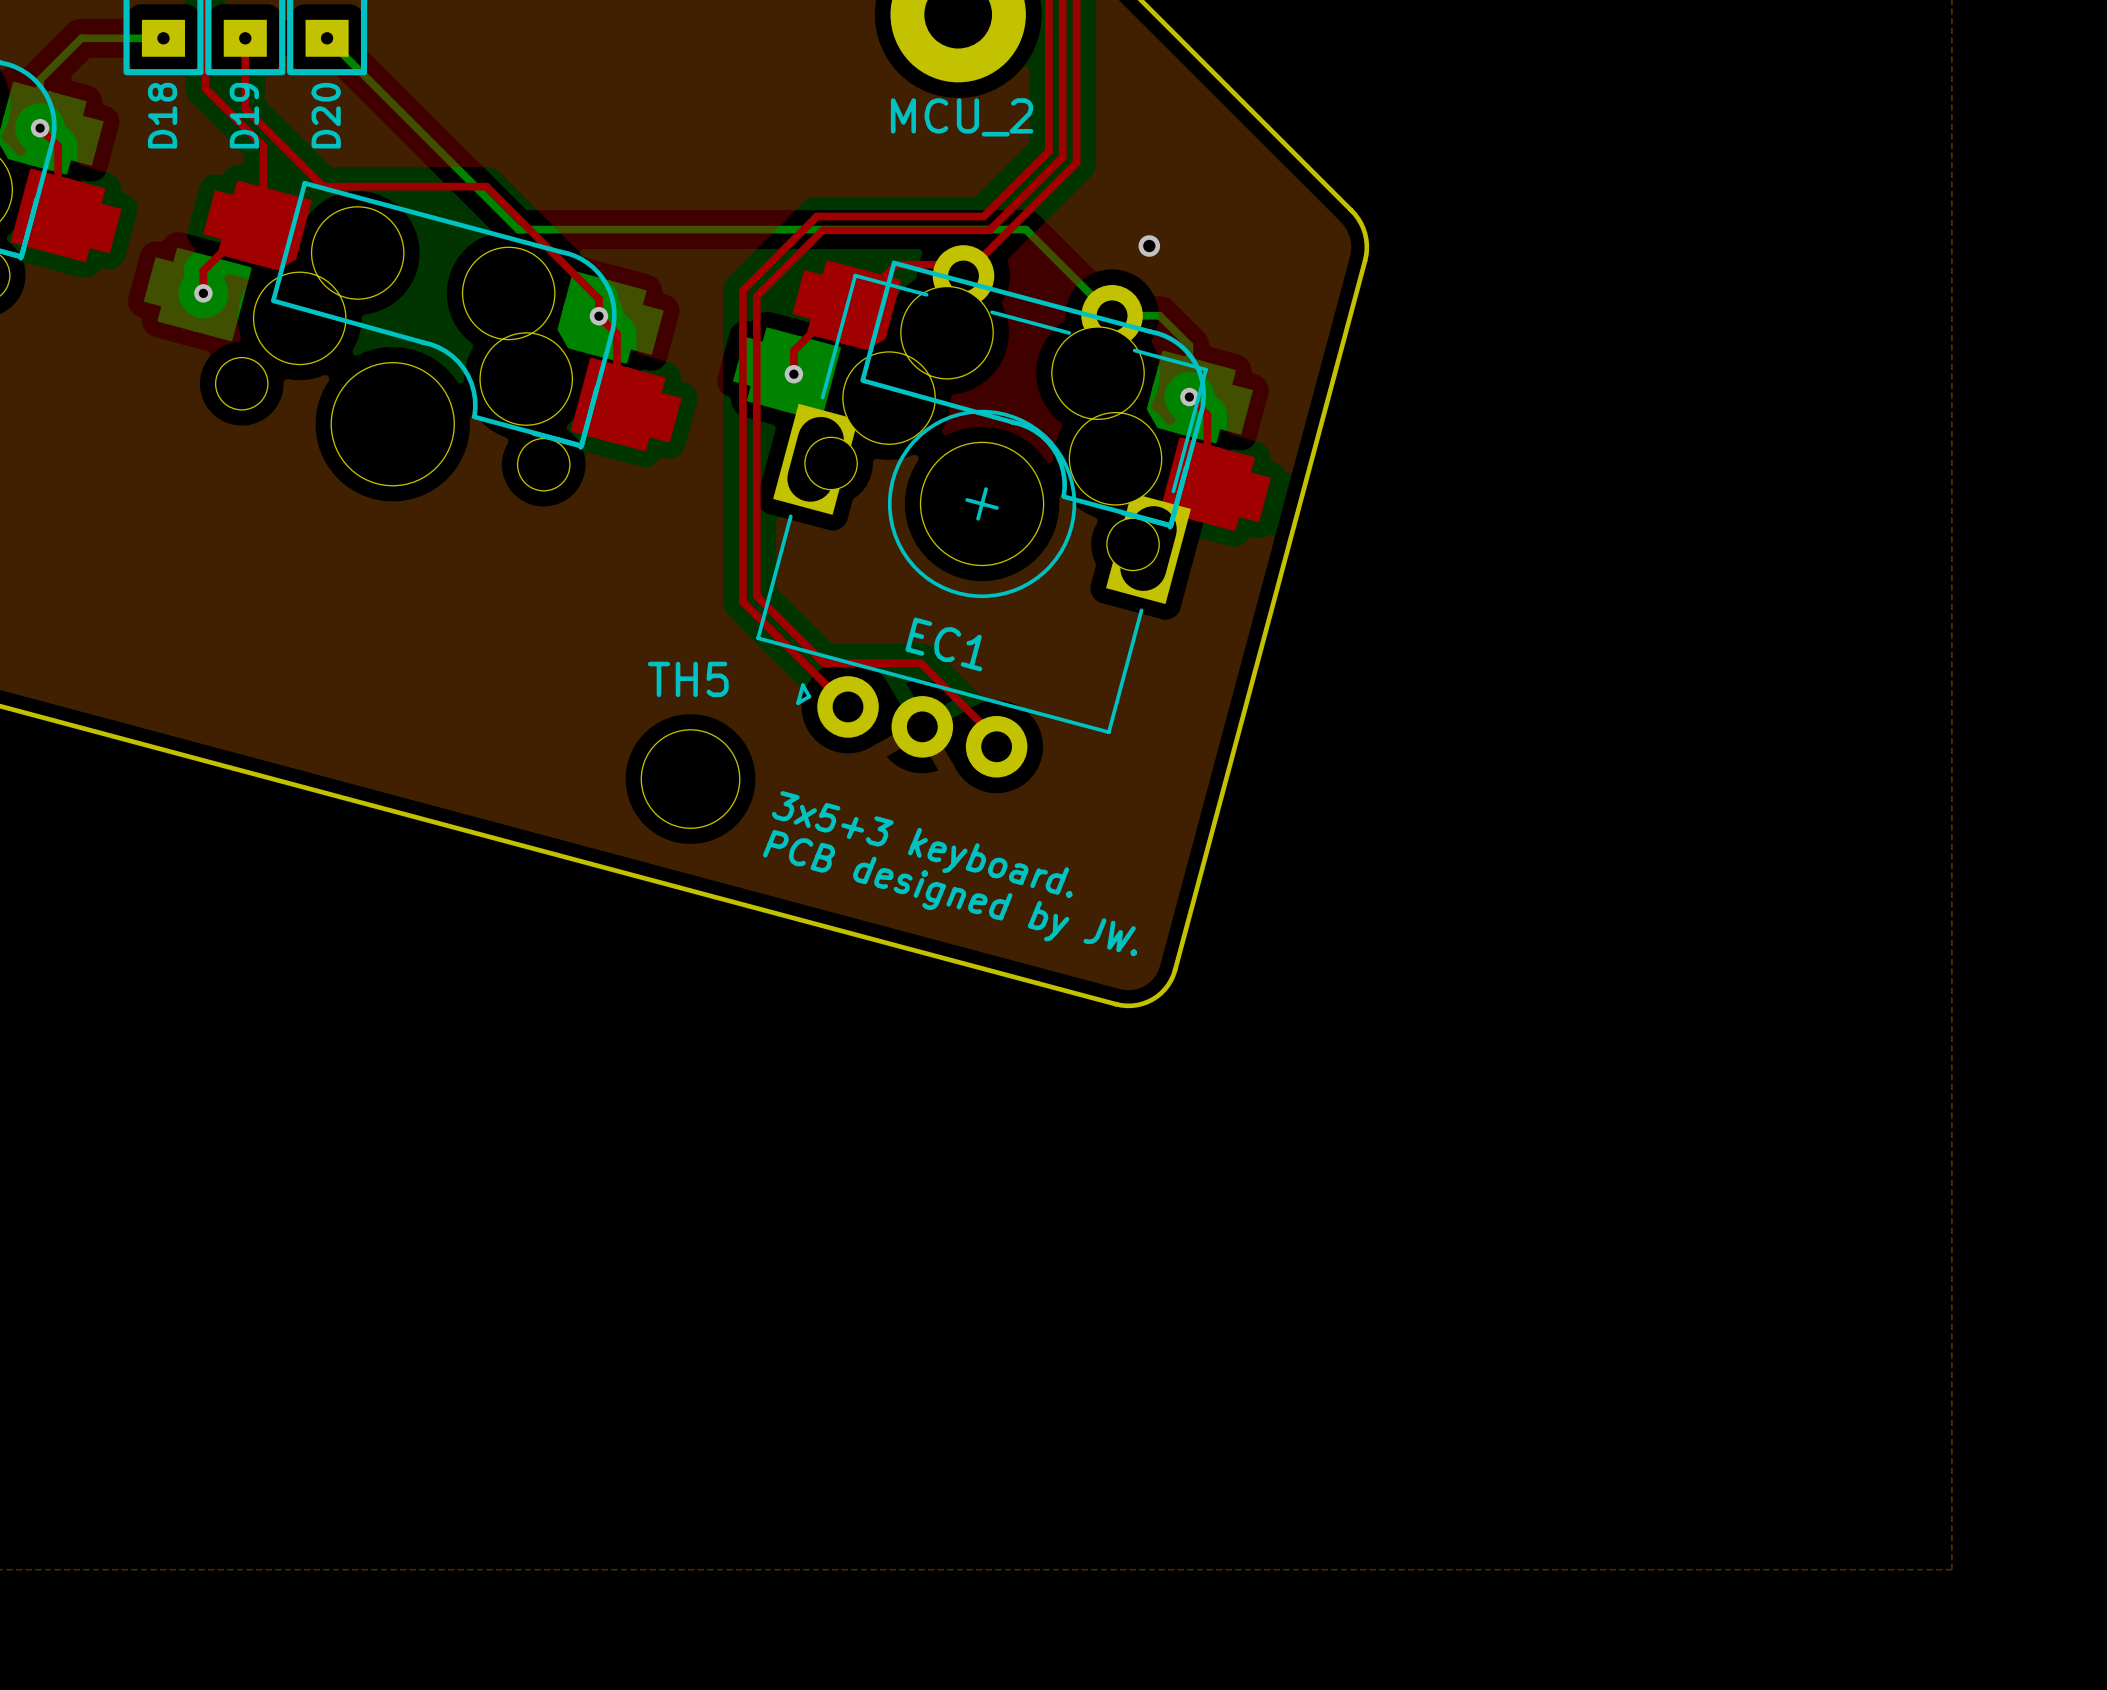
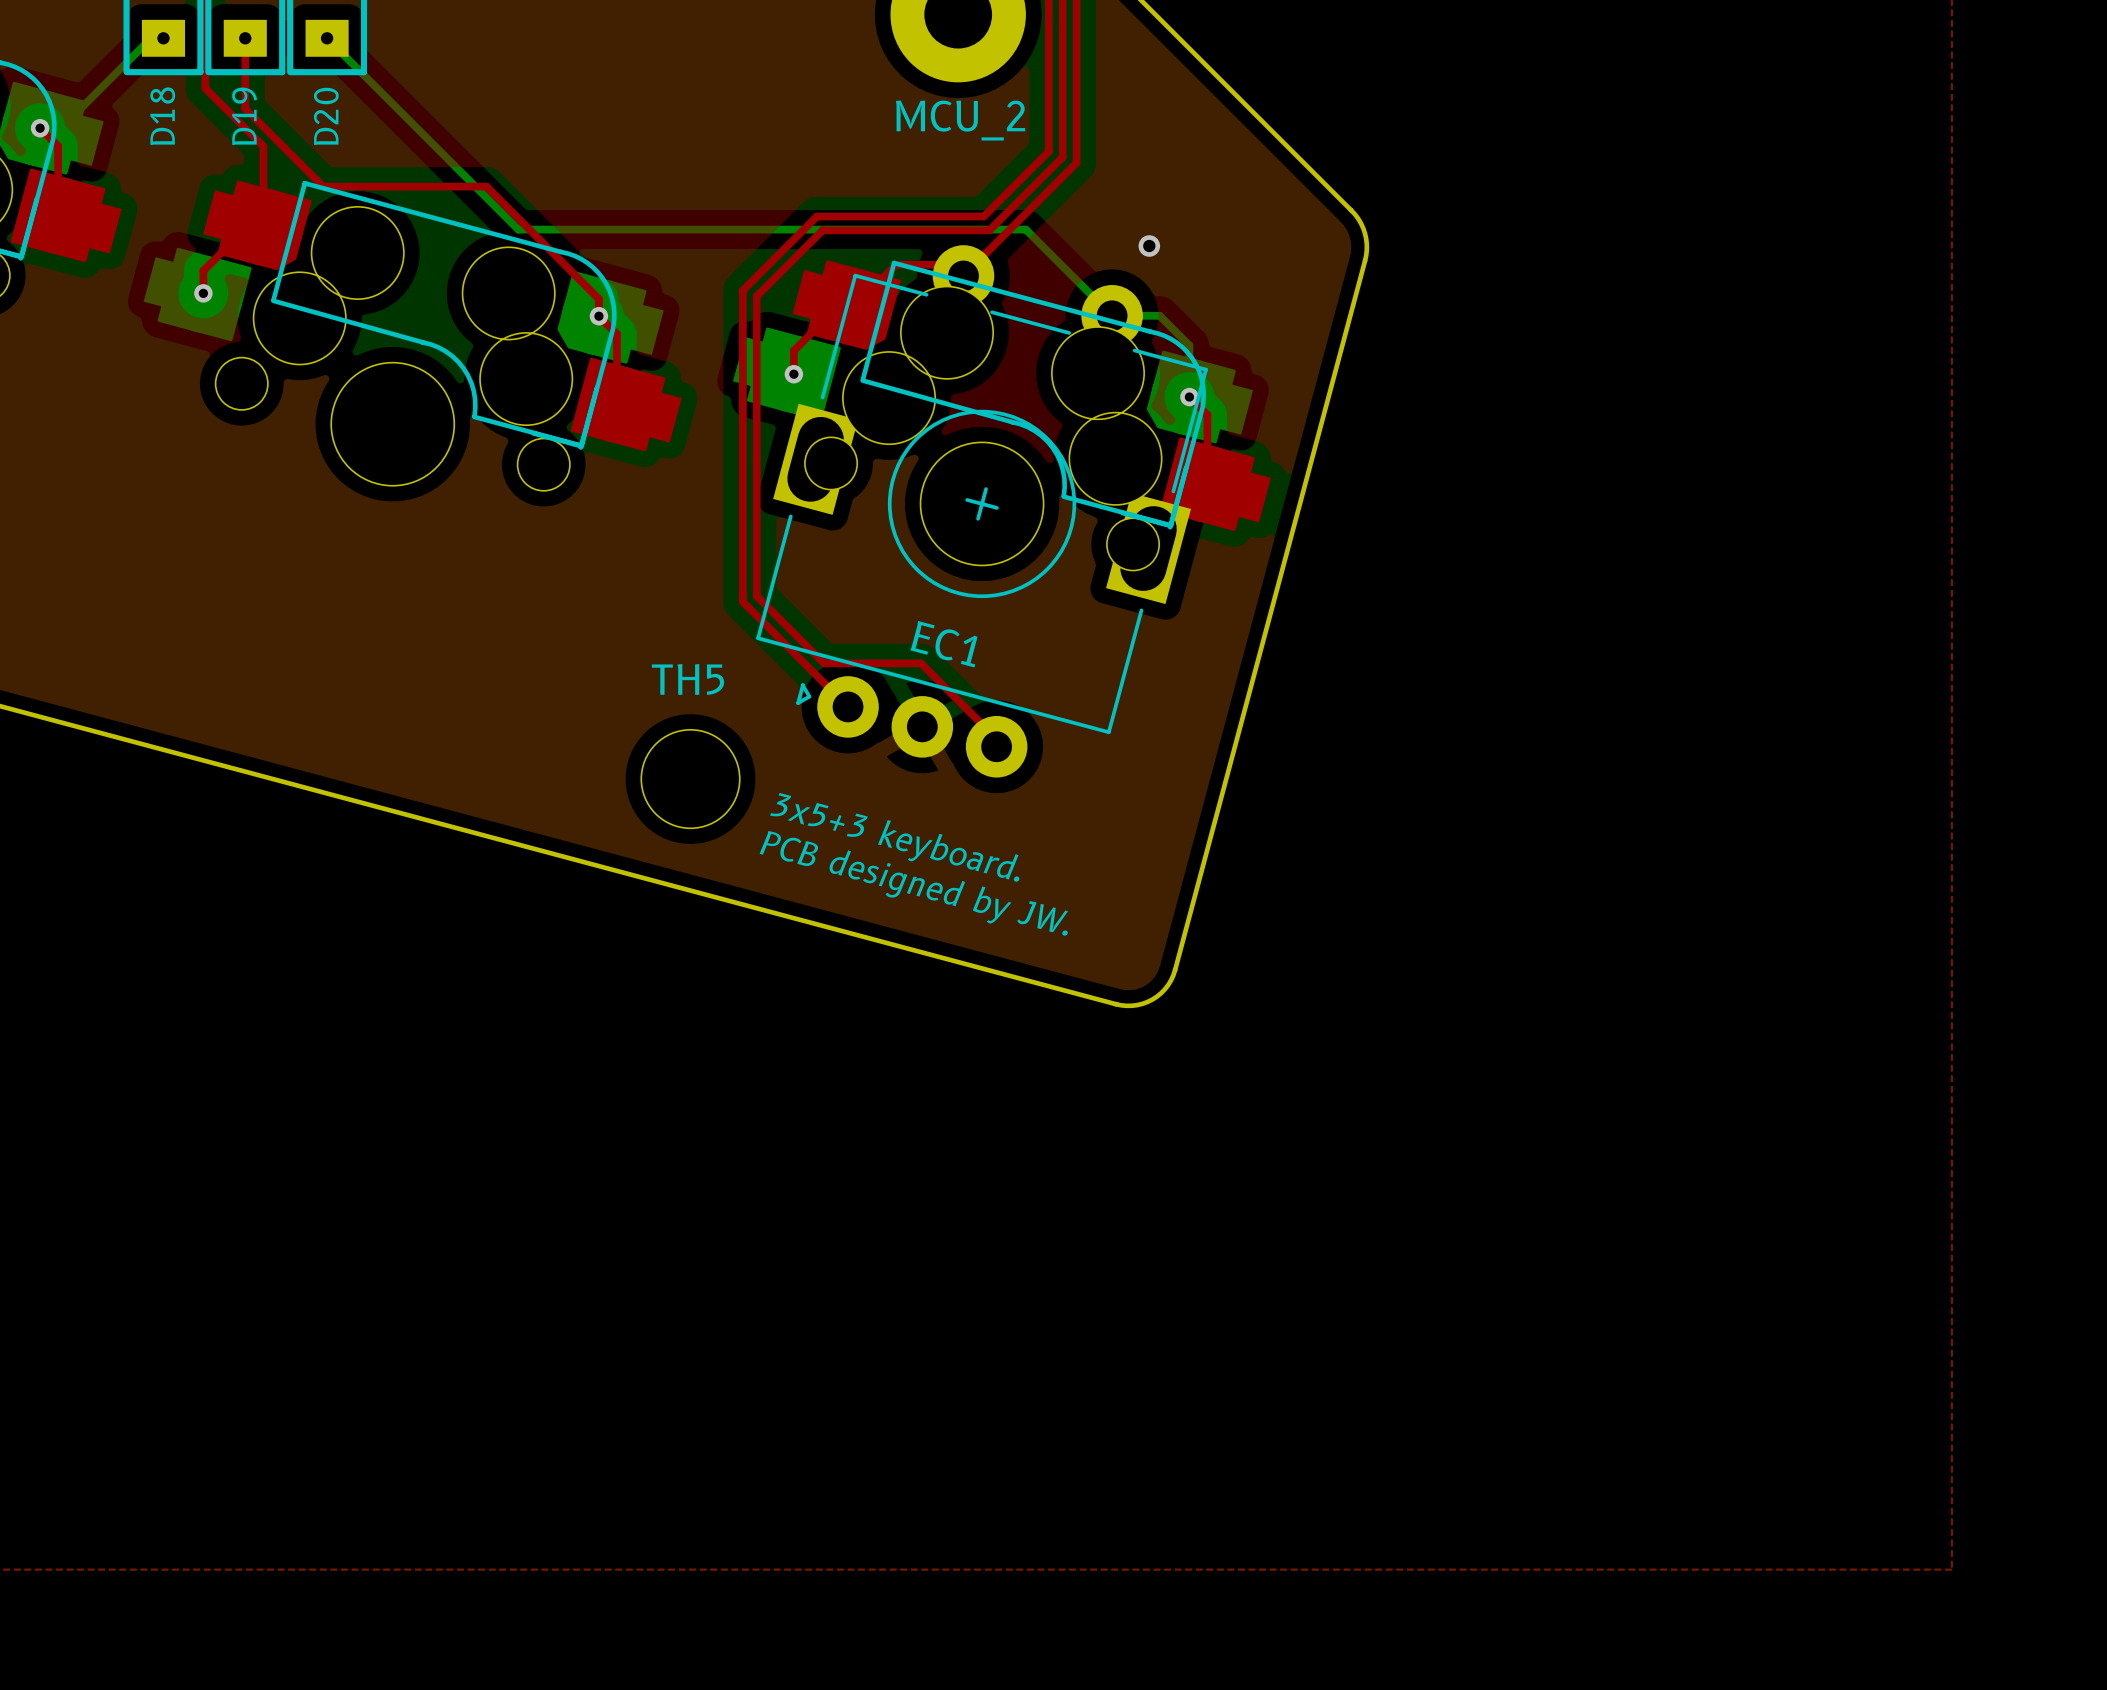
bottom track: (151, 38) (81, 38) (40, 79) (40, 128) -> (151, 38) (61, 128) (40, 128)

